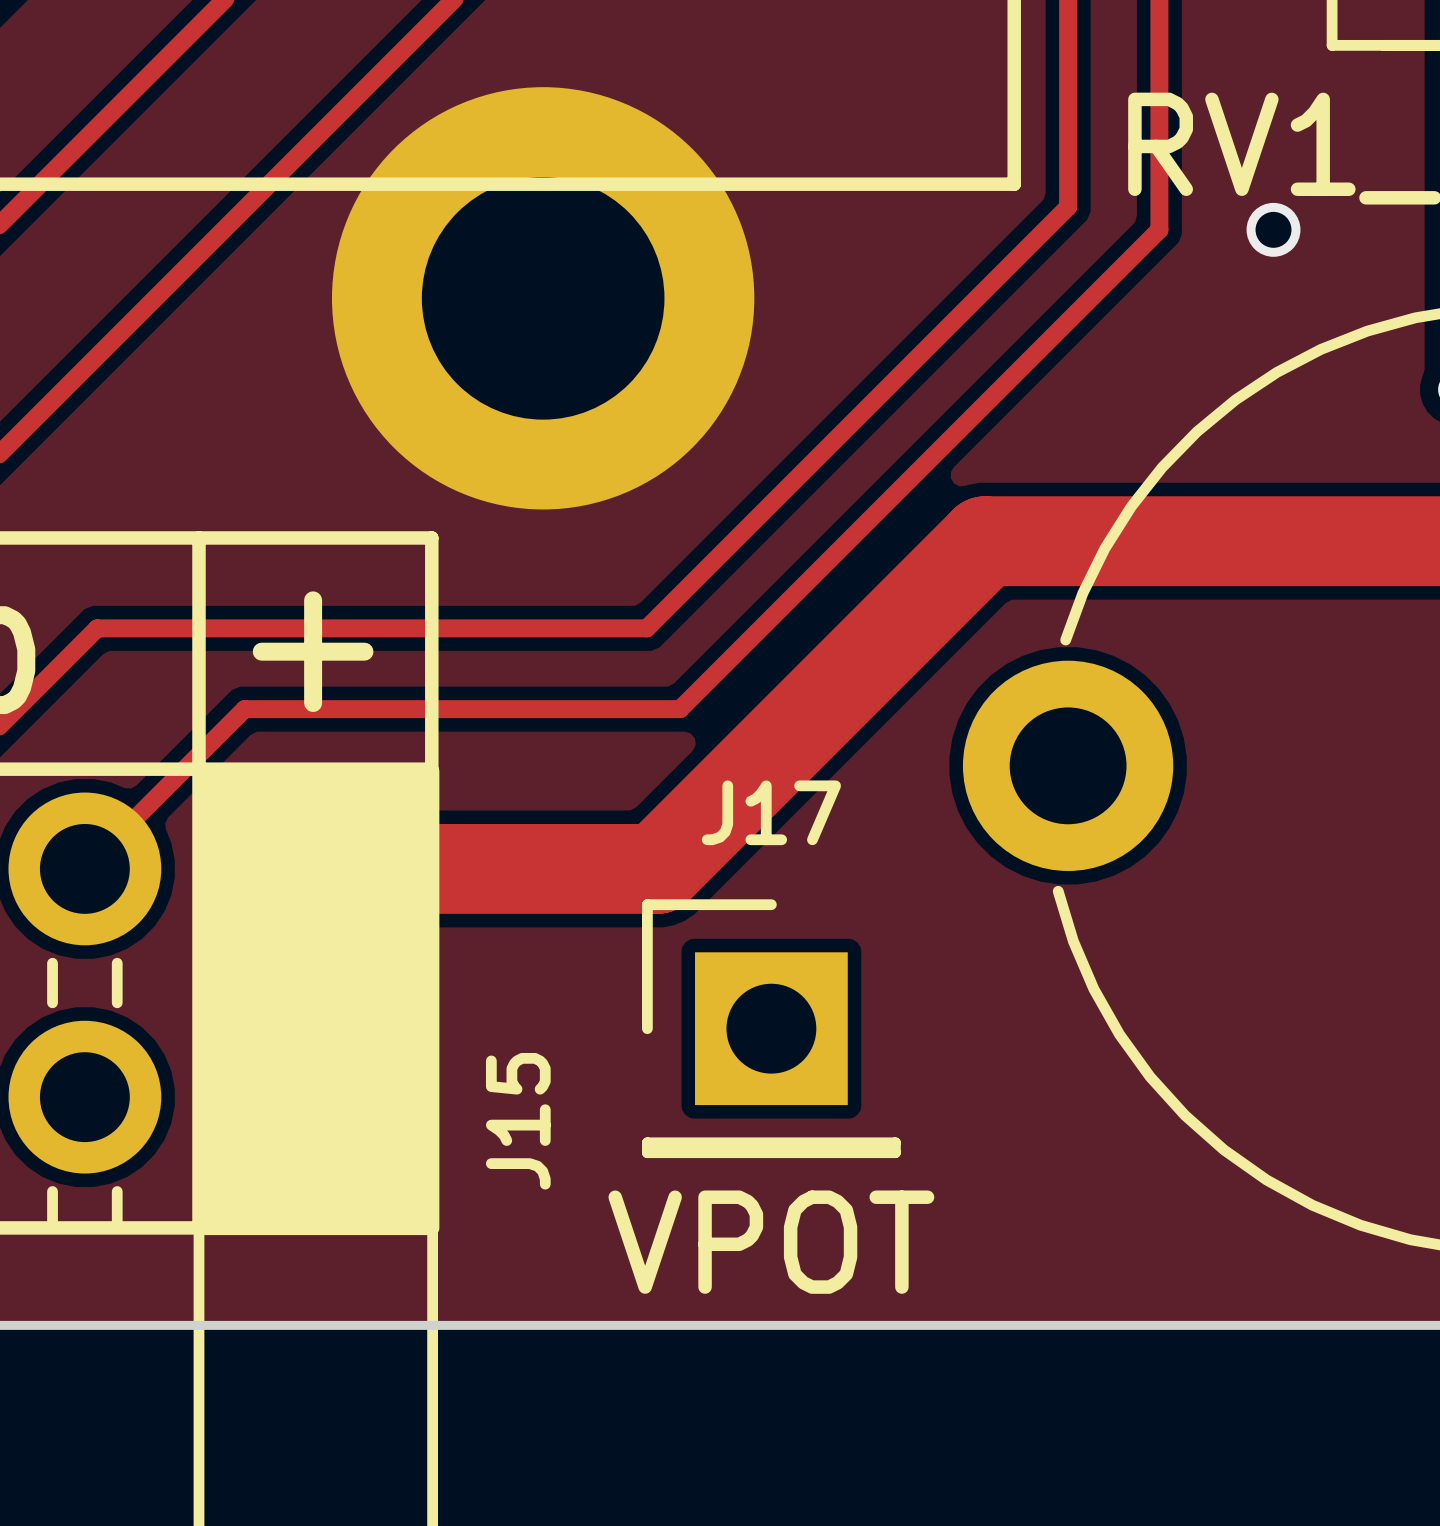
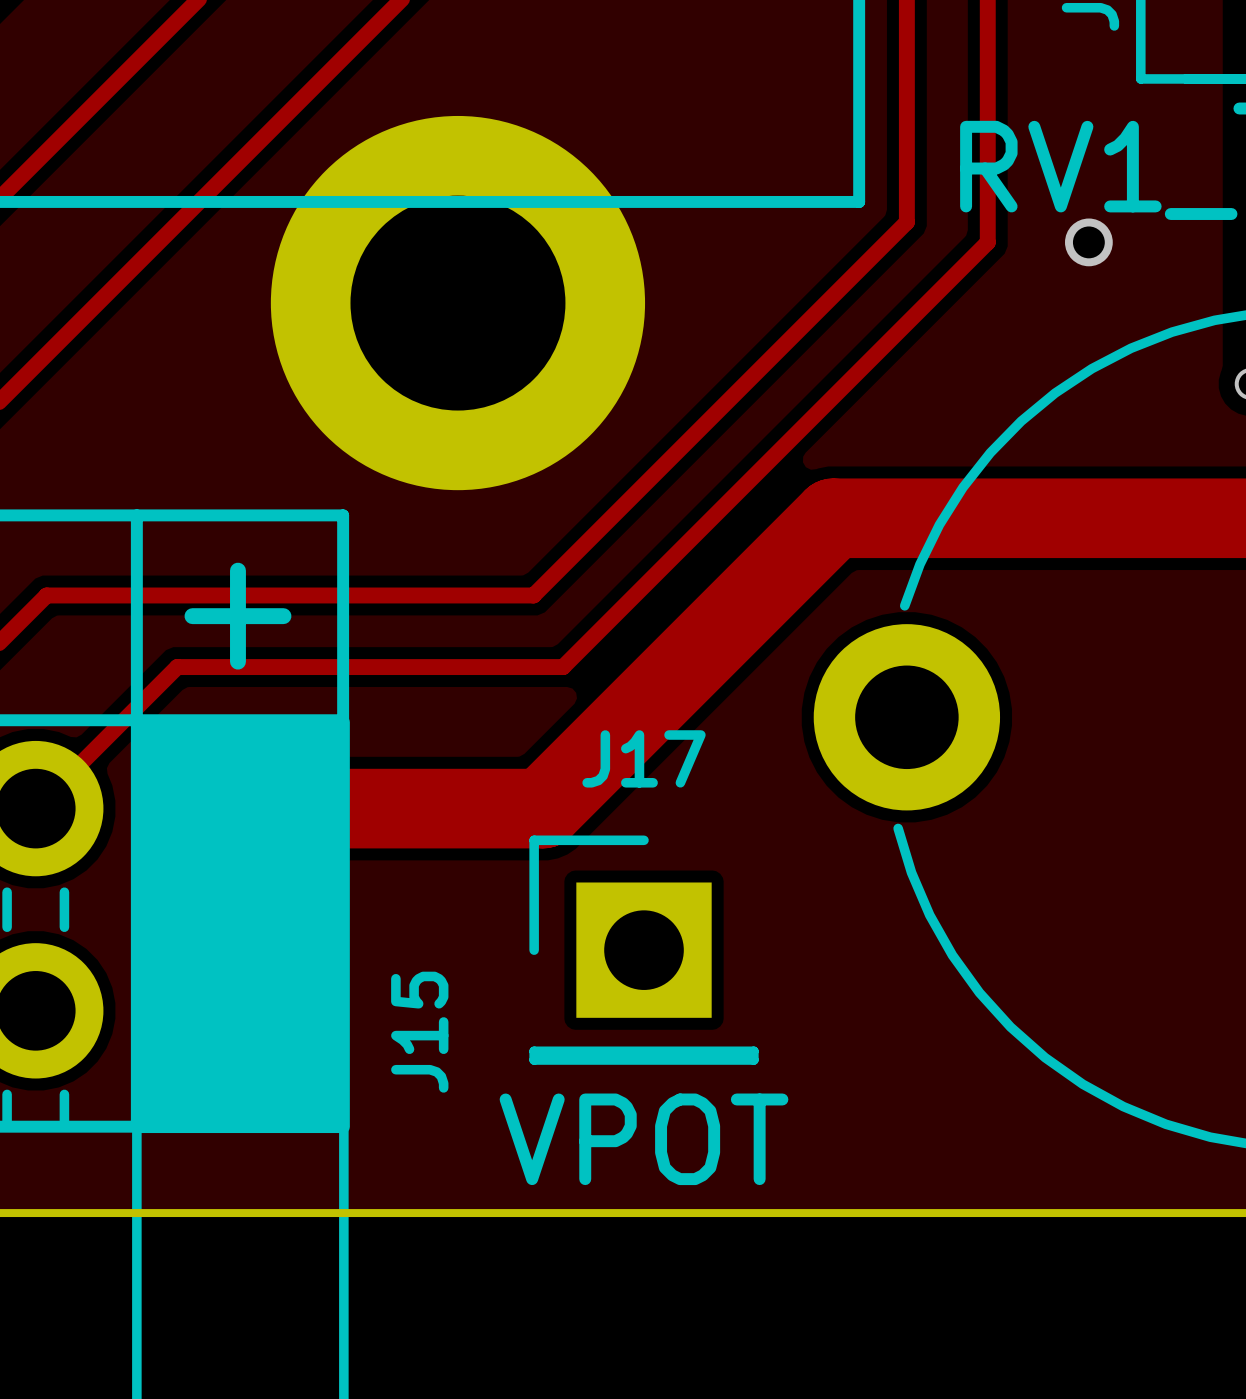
part position: (543, 298) -> (457, 303)

